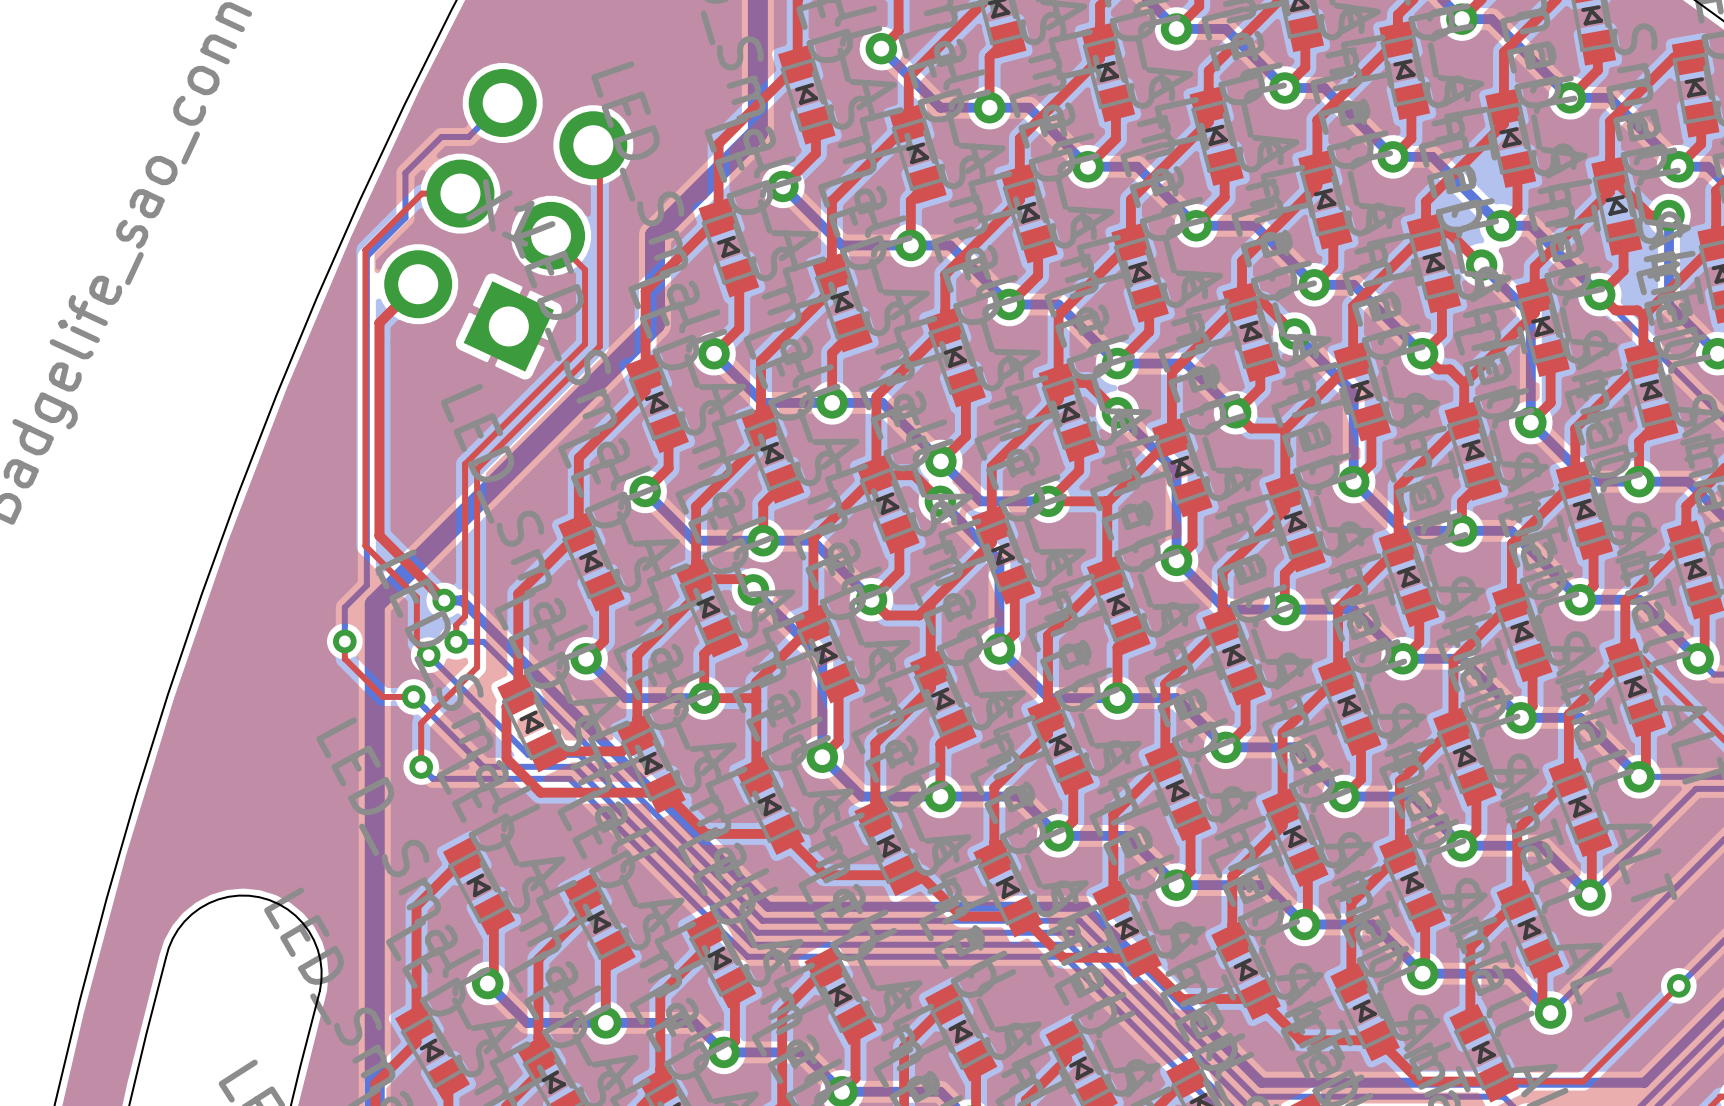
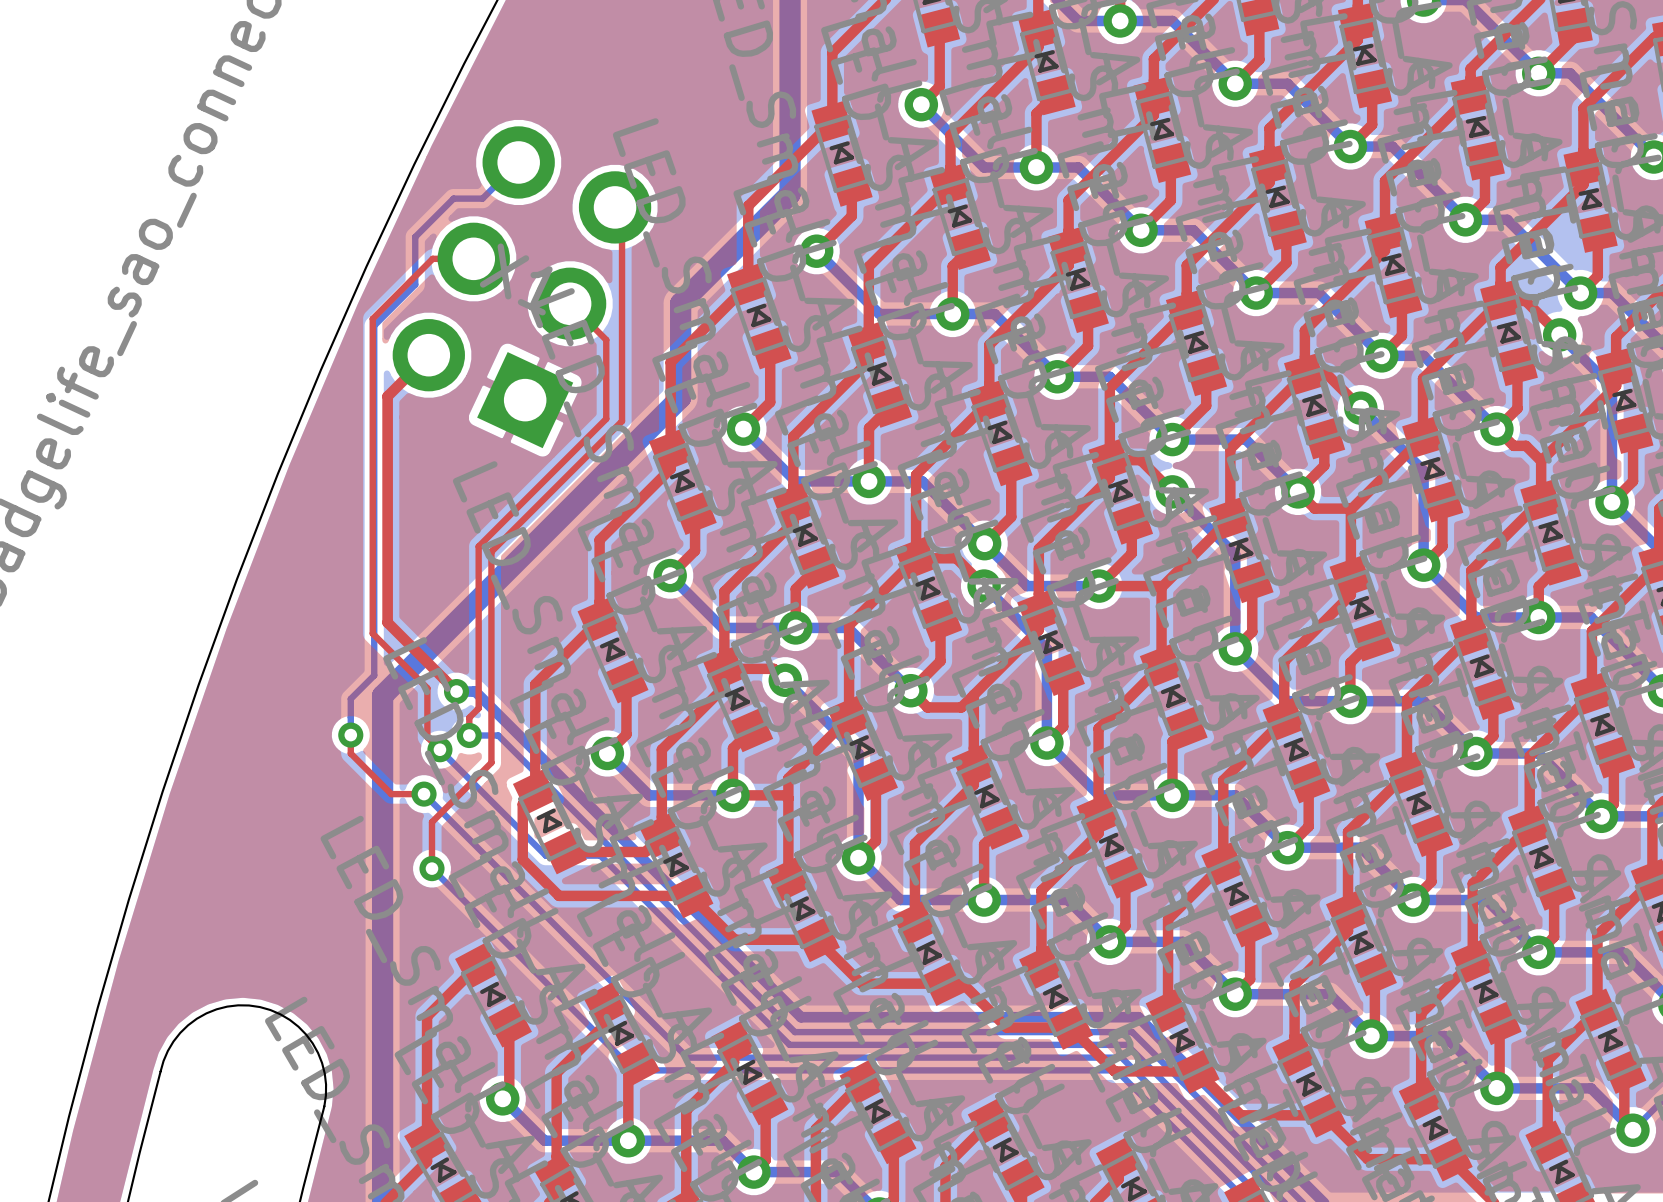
bottom track: (483, 766) (574, 766) (752, 944) -> (498, 868) (687, 1057) (784, 1057)
bottom track: (432, 778) (569, 778) (747, 956) -> (444, 881) (633, 1070) (779, 1070)

